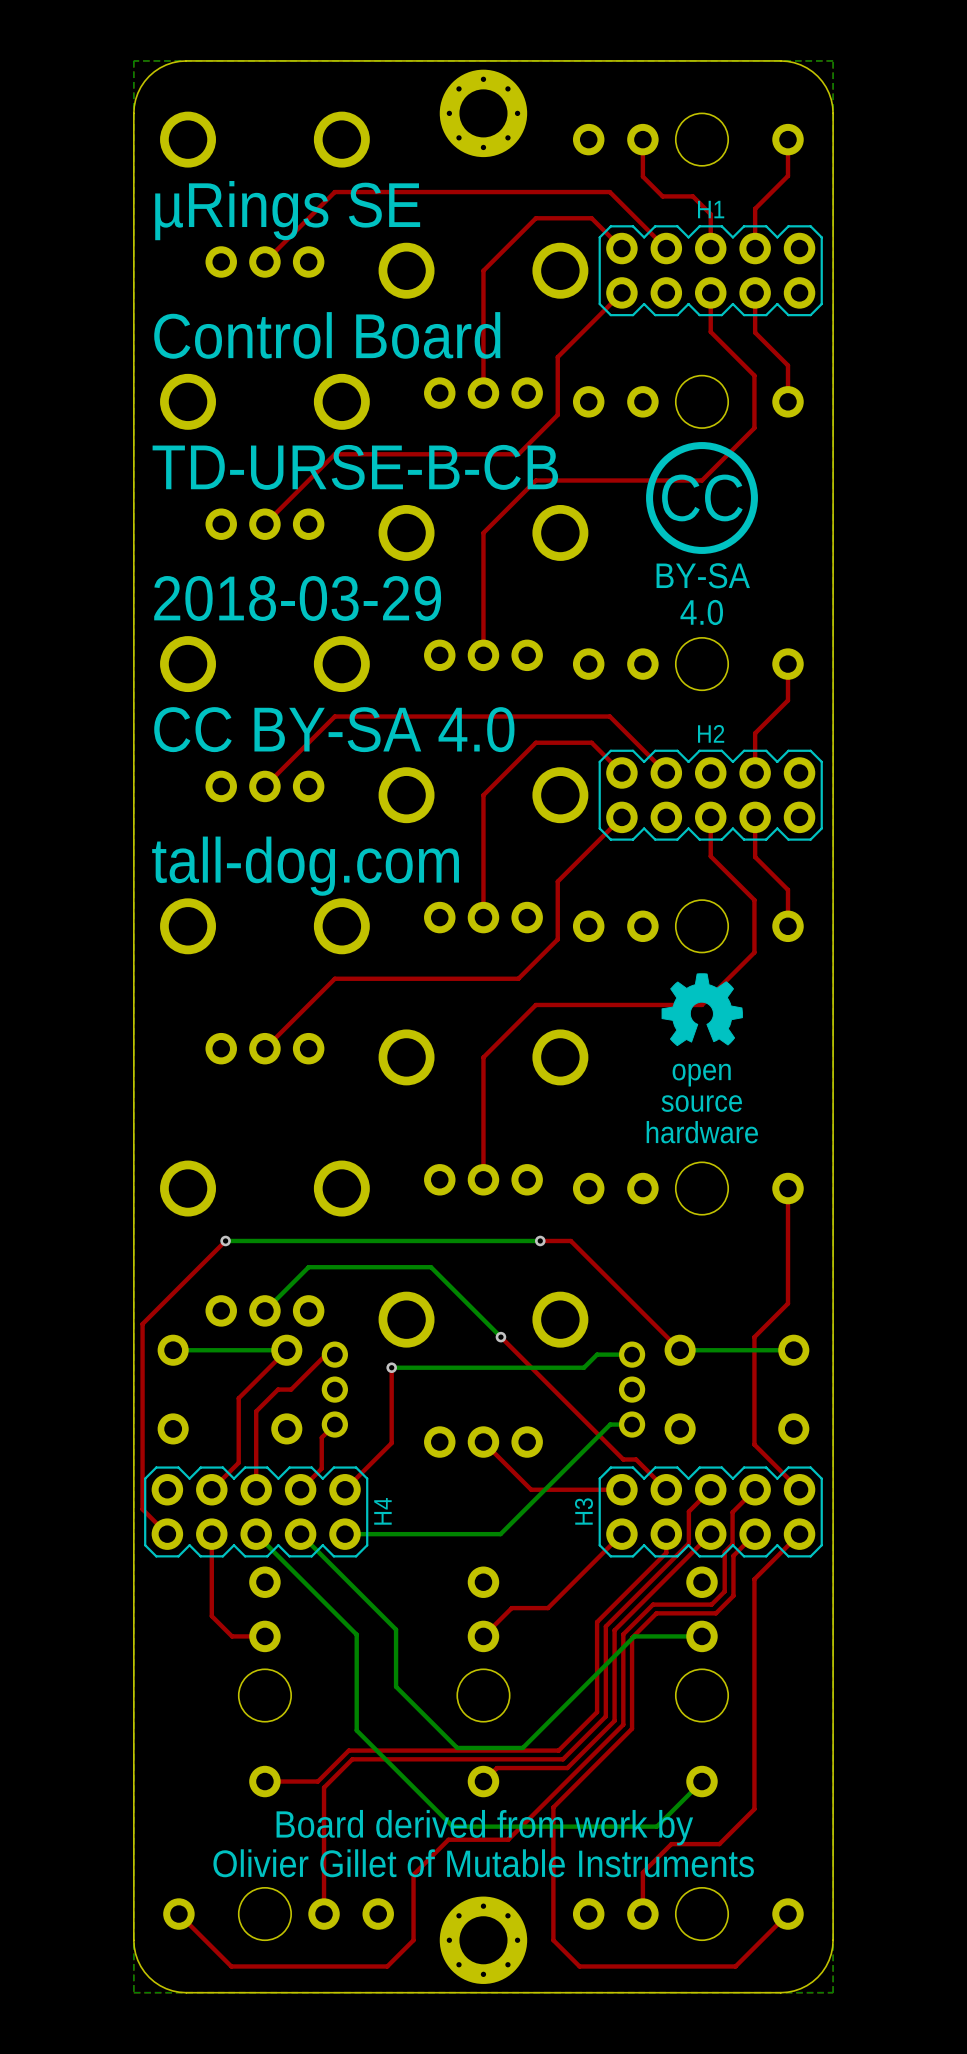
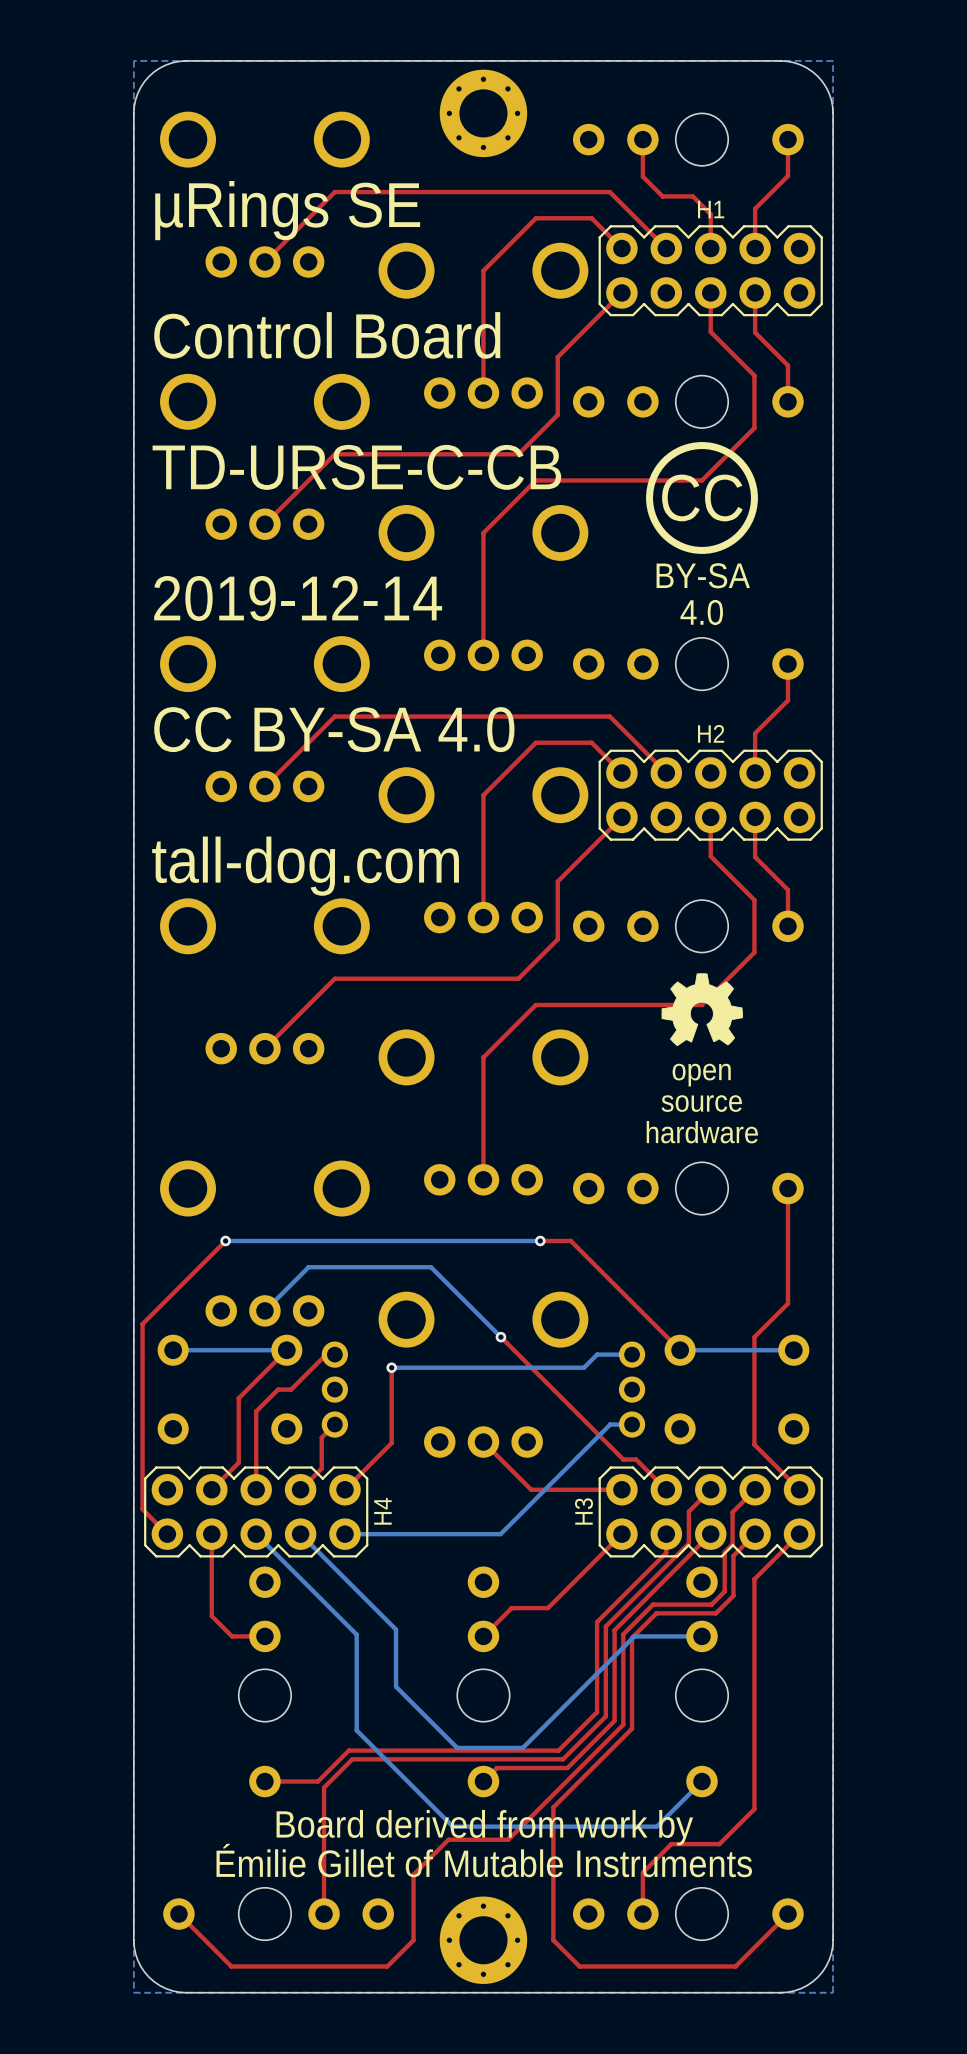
text: TD-URSE-B-CB (355, 467) -> TD-URSE-C-CB (356, 467)
text: 2018-03-29 (297, 598) -> 2019-12-14 (298, 598)
text: Olivier Gillet of Mutable Instruments (483, 1863) -> Émilie Gillet of Mutable Instruments (484, 1860)

